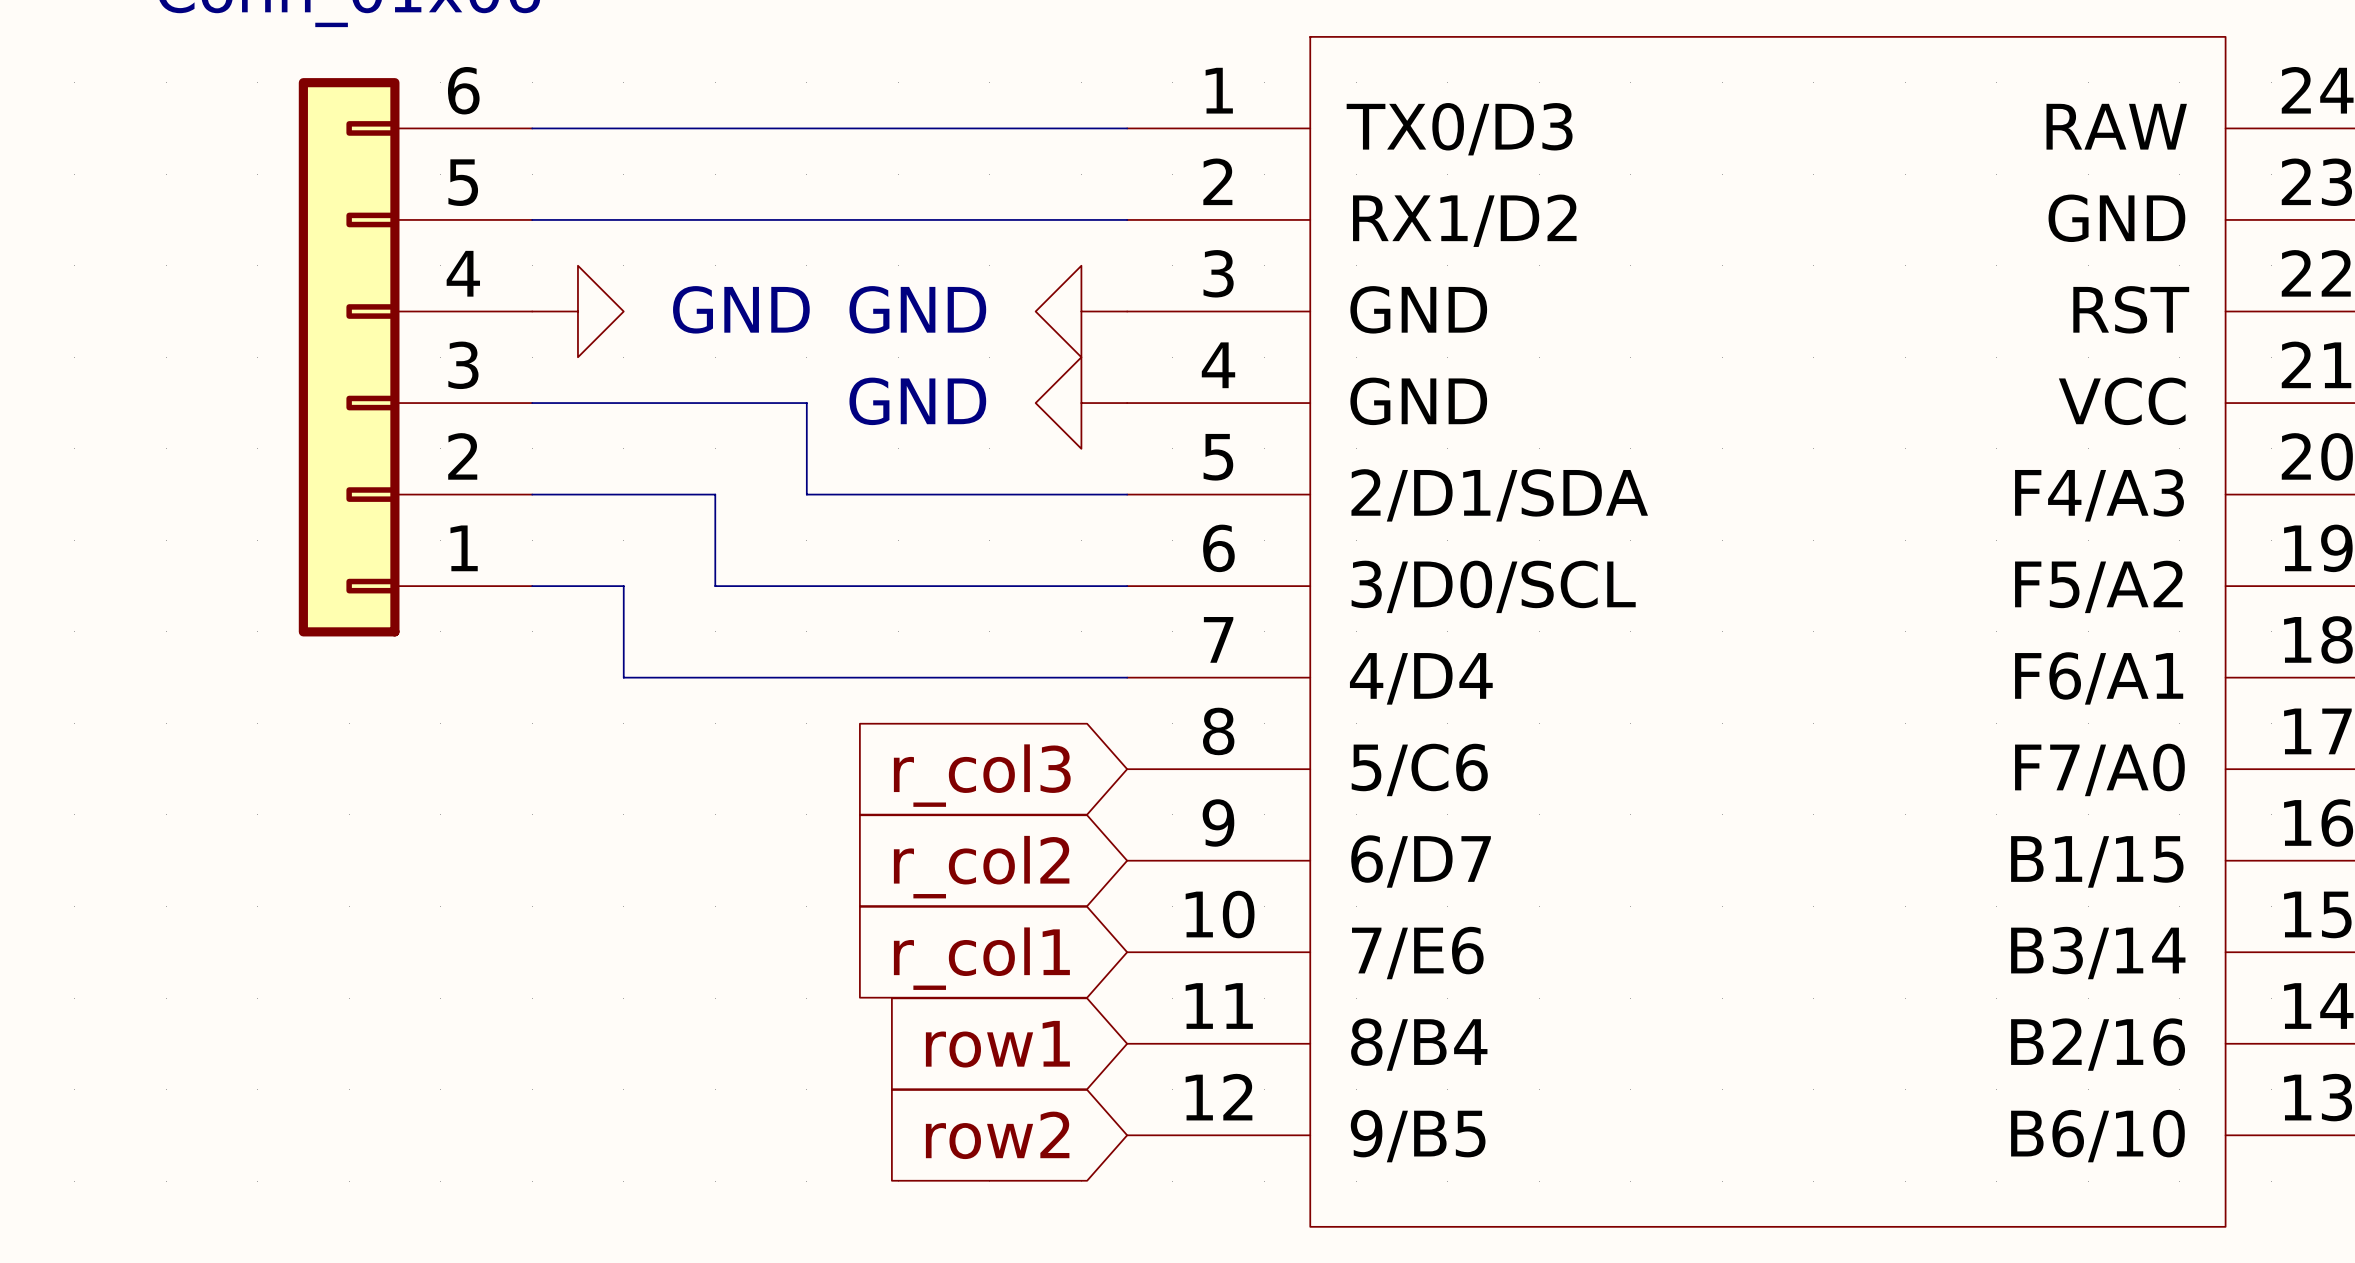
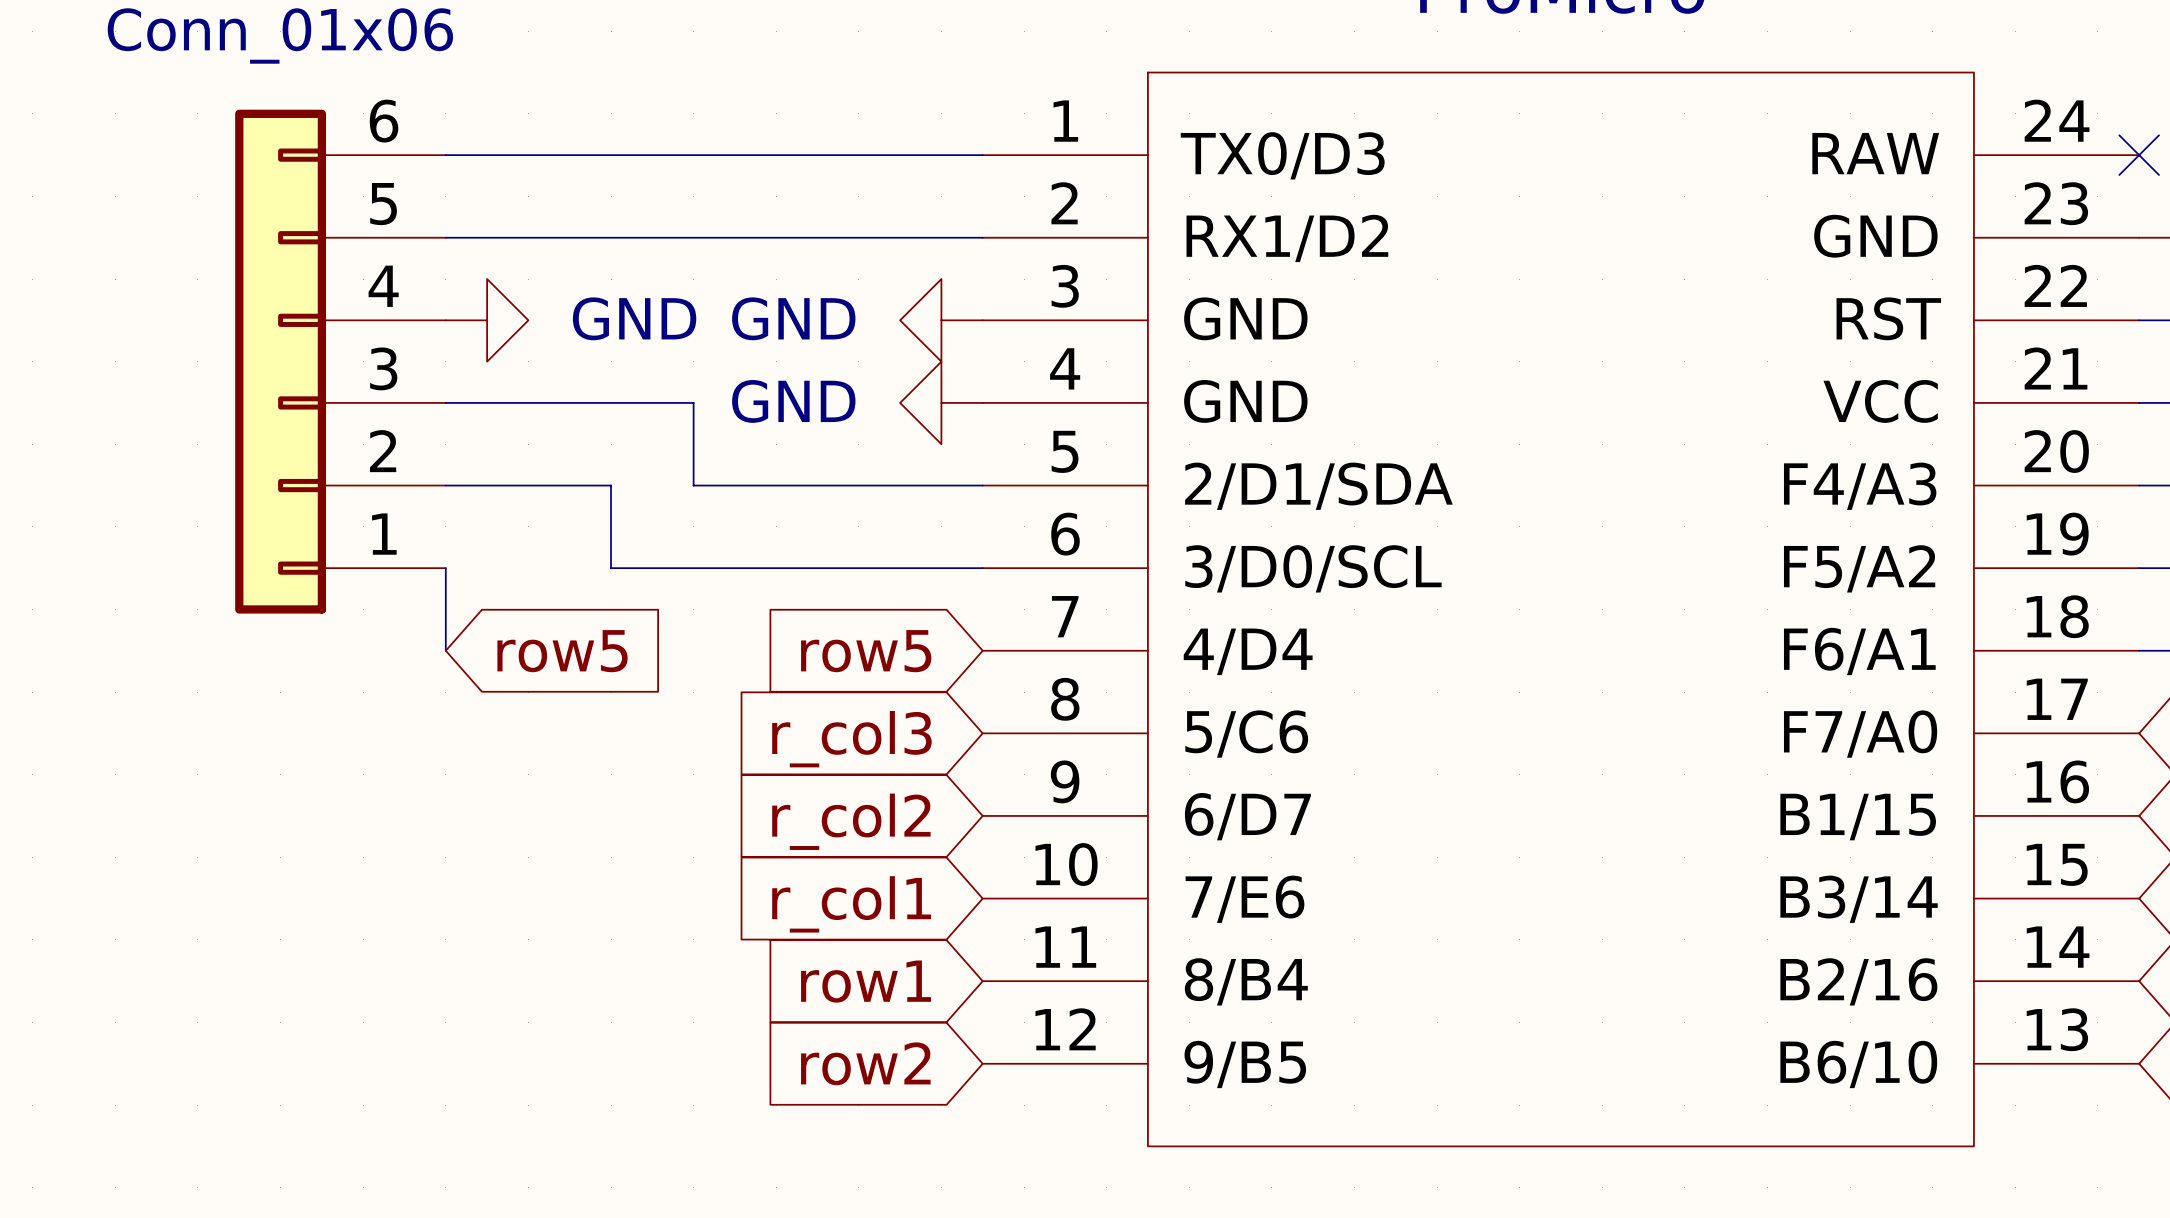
wire: (532, 586) (623, 586) (623, 677) (1127, 677) -> (445, 568) (445, 650)
global label: none -> row5 (562, 651)
global label: none -> row5 (866, 651)

